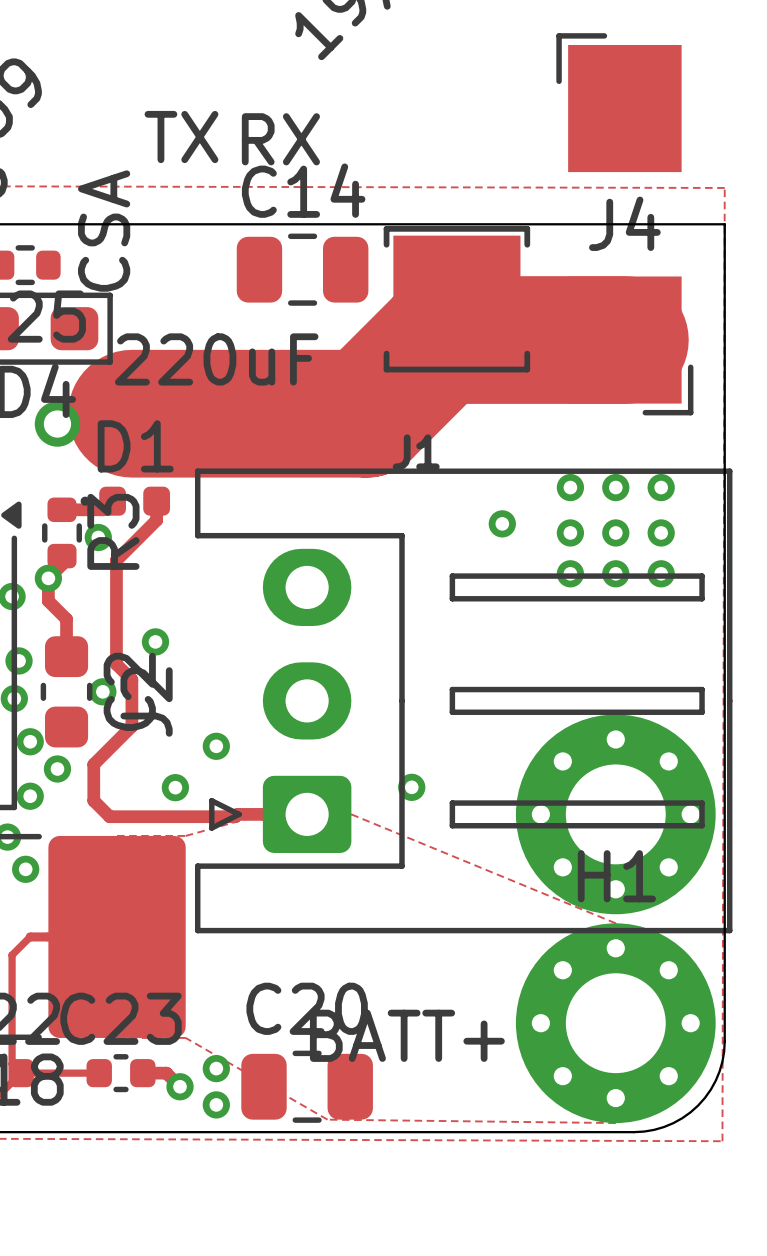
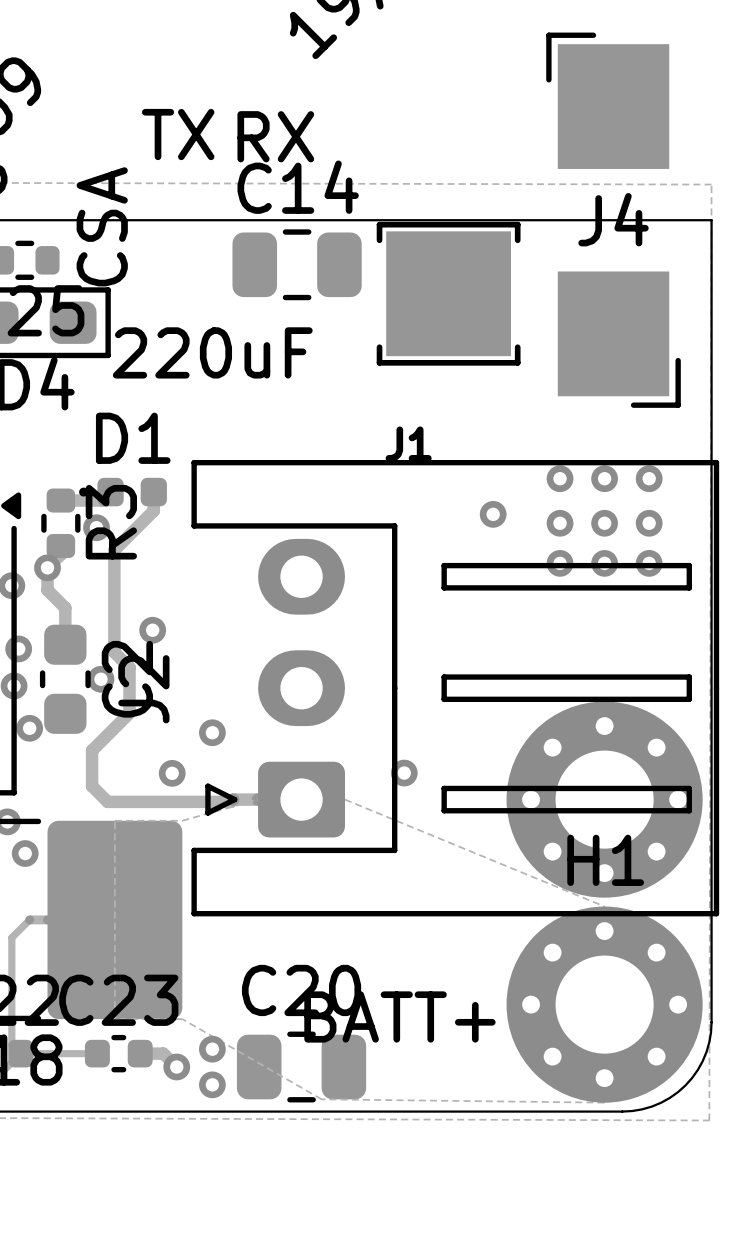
track: (624, 340) (440, 340) (366, 413) (67, 413) (57, 424) -> none
via: (57, 424) -> none
via: (57, 769) -> none
via: (30, 796) -> none

